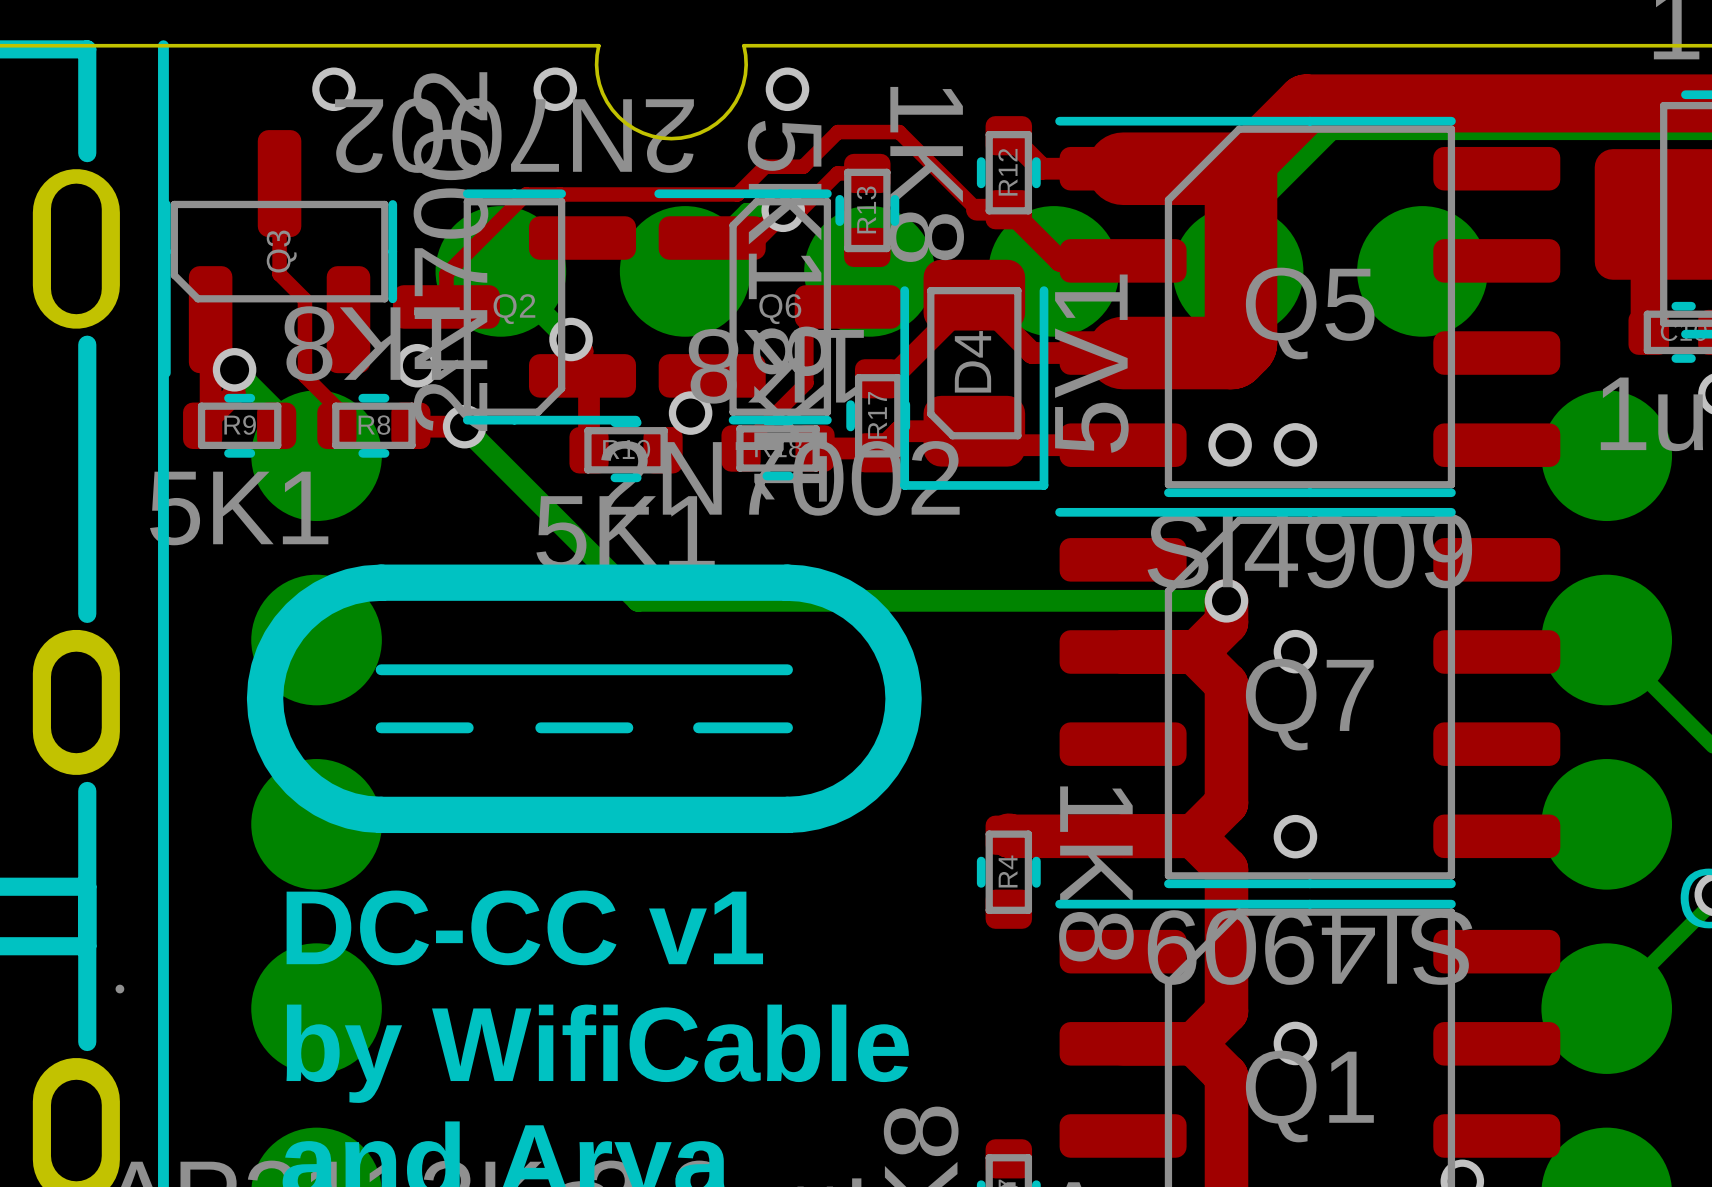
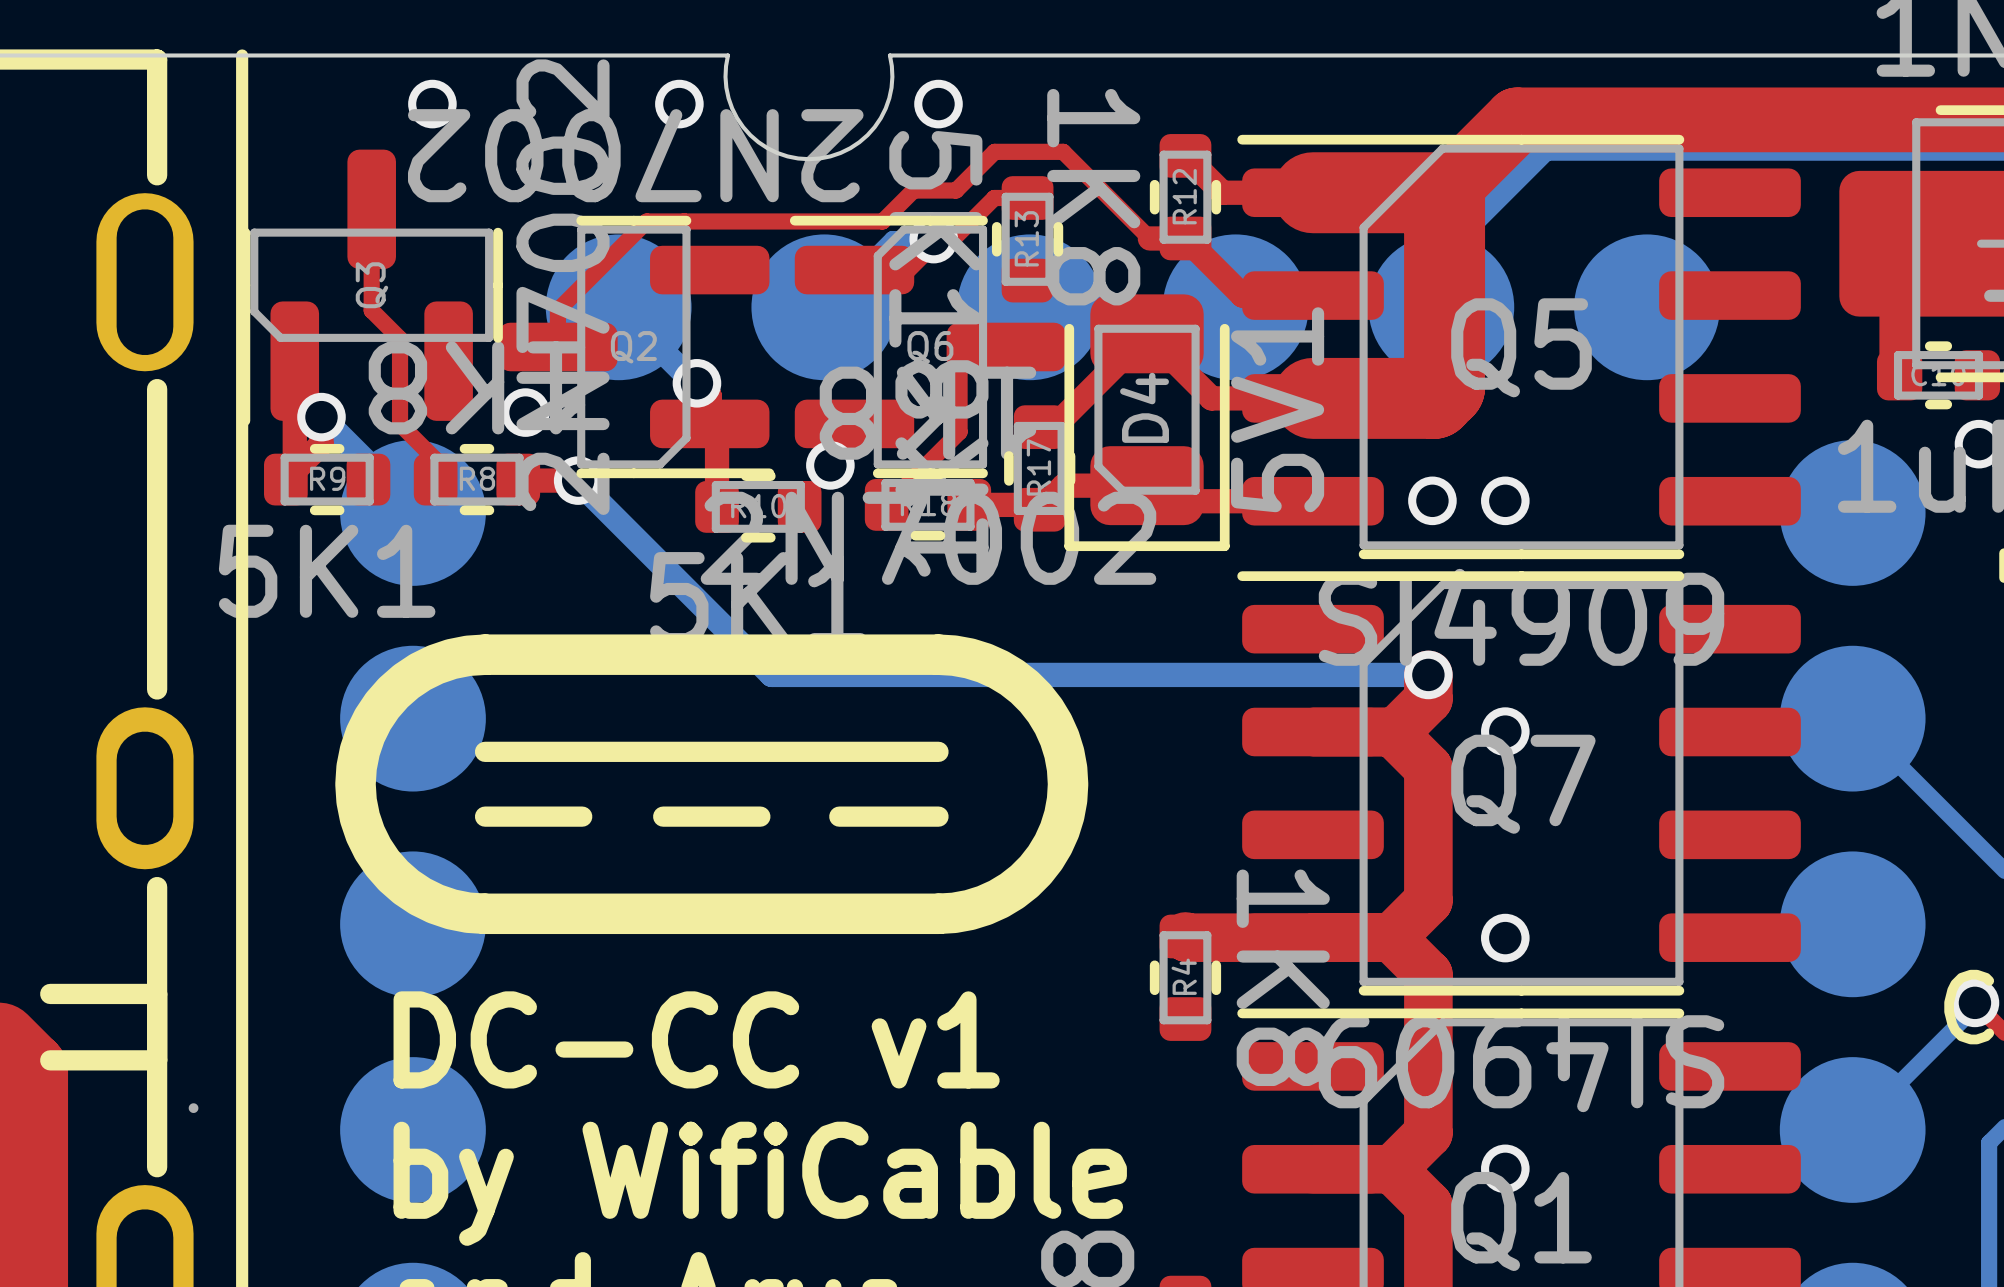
line width: thin (381, 669) (787, 669) -> thick (485, 751) (938, 751)
line width: thin (381, 727) (468, 727) -> thick (485, 816) (582, 816)
line width: thin (540, 727) (627, 727) -> thick (663, 816) (760, 816)
line width: thin (698, 727) (787, 727) -> thick (839, 816) (938, 816)

